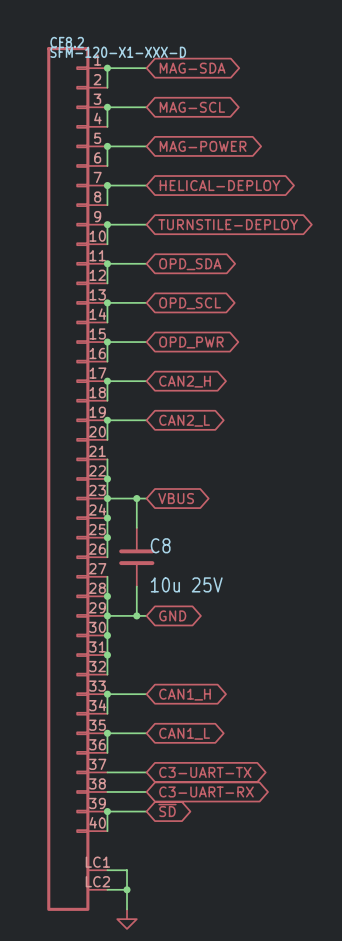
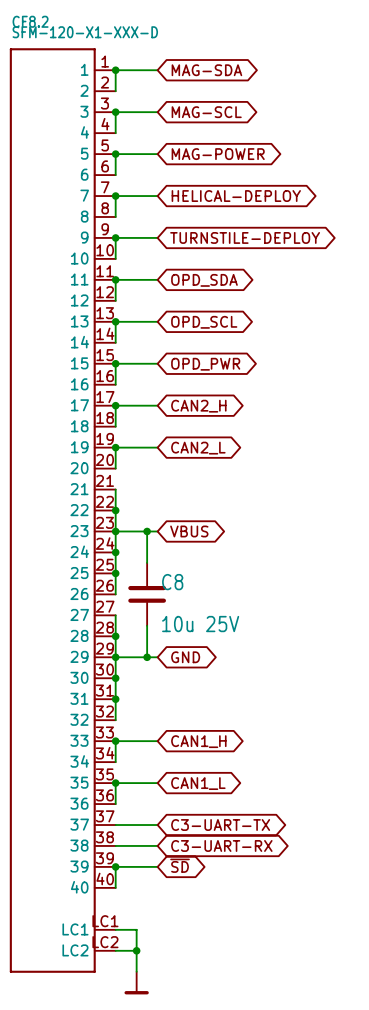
CF8.2 name position: CF8.2 (67, 42) -> CF8.2 (30, 21)
CF8.2 symbol: [47, 47, 108, 911] -> [9, 48, 116, 973]
CF8.2 value position: SFM-120-X1-XXX-D (118, 52) -> SFM-120-X1-XXX-D (85, 32)
power symbol shape: [117, 909, 137, 929] -> [124, 971, 149, 995]

